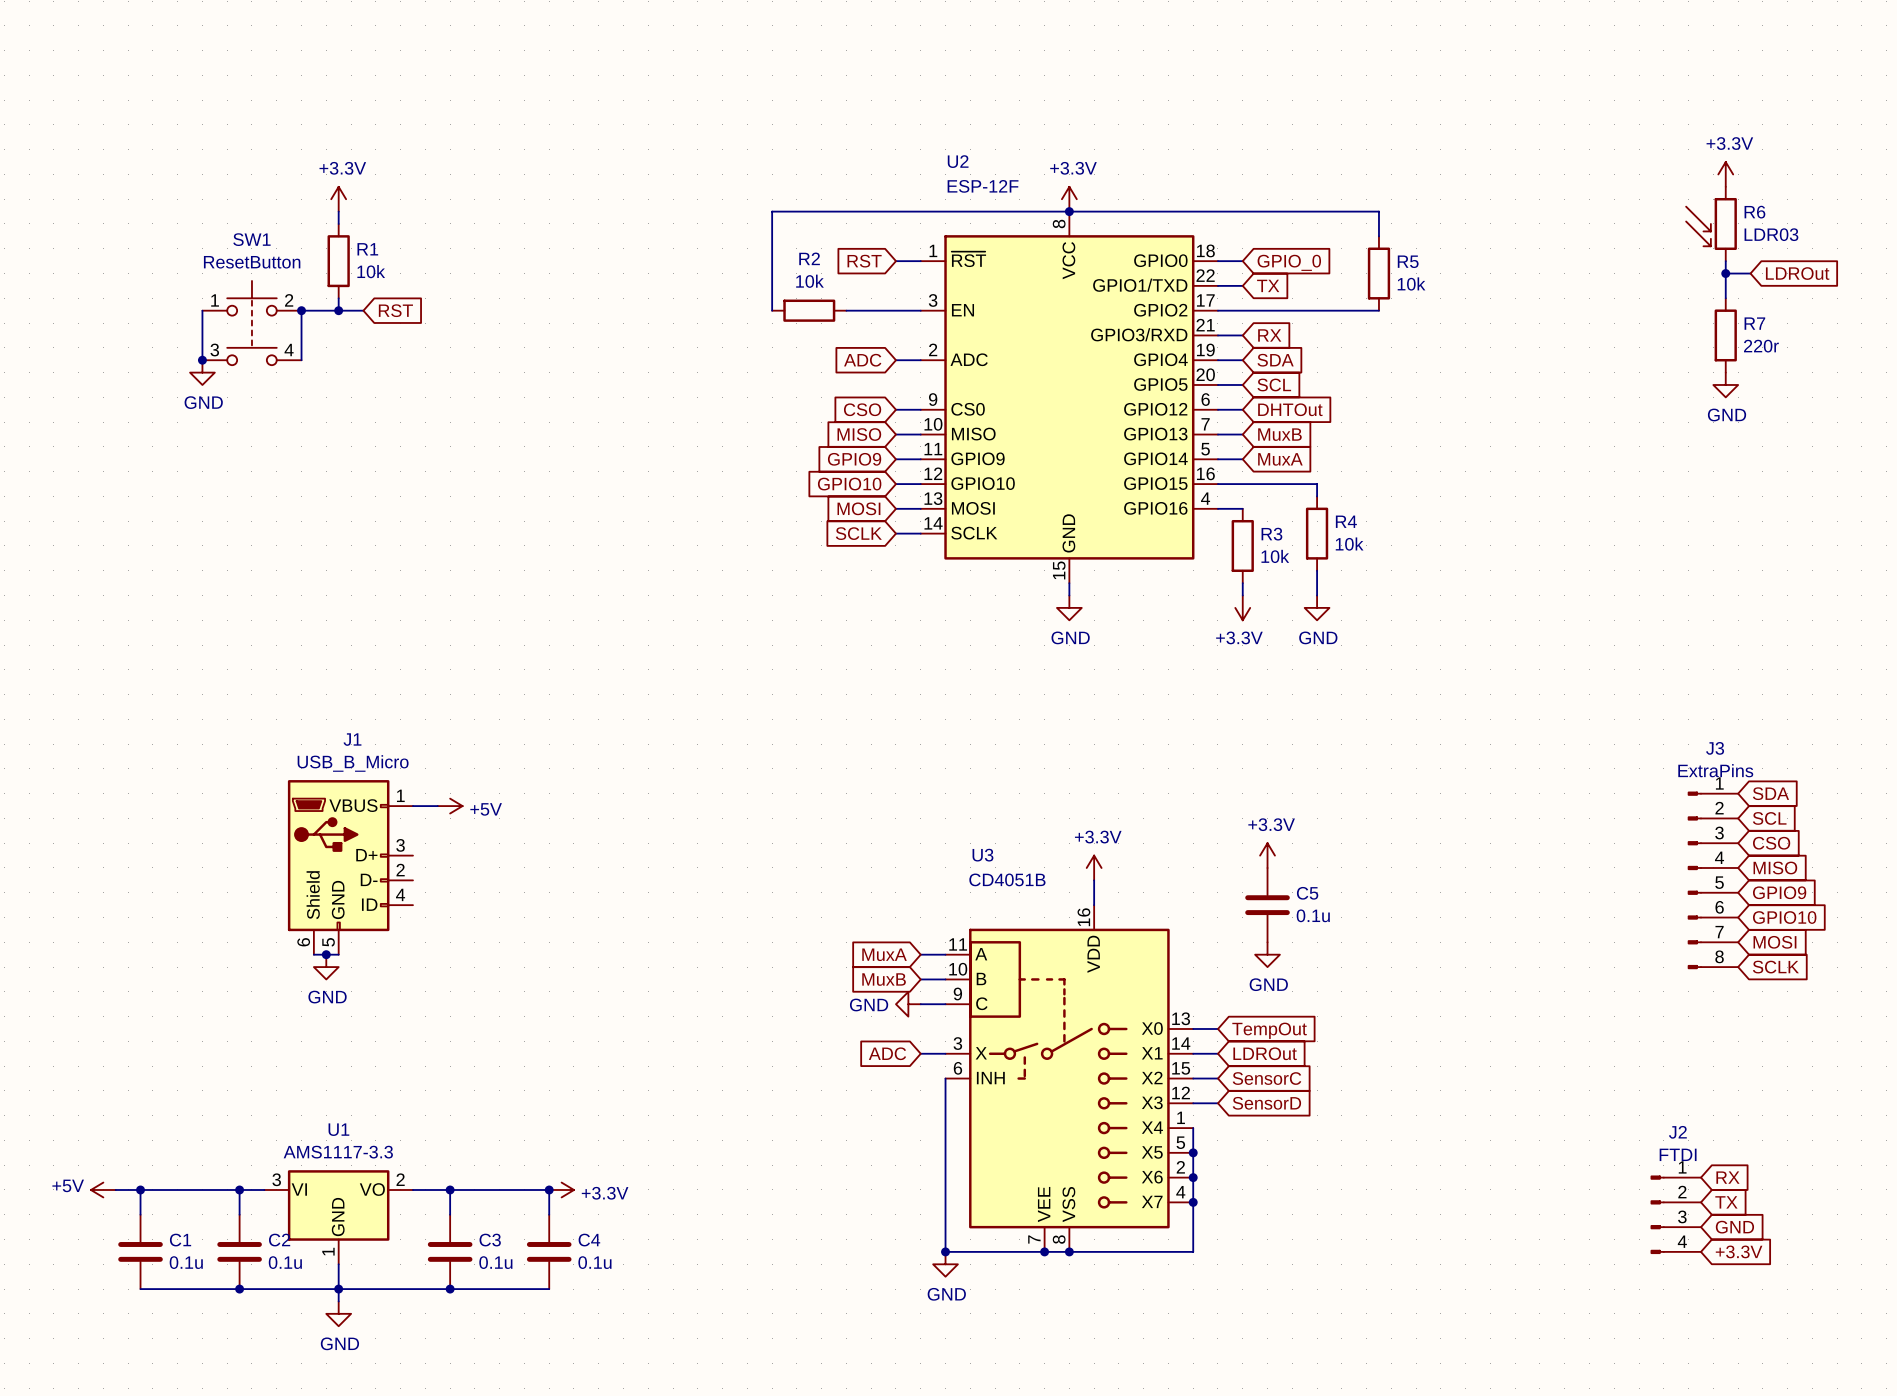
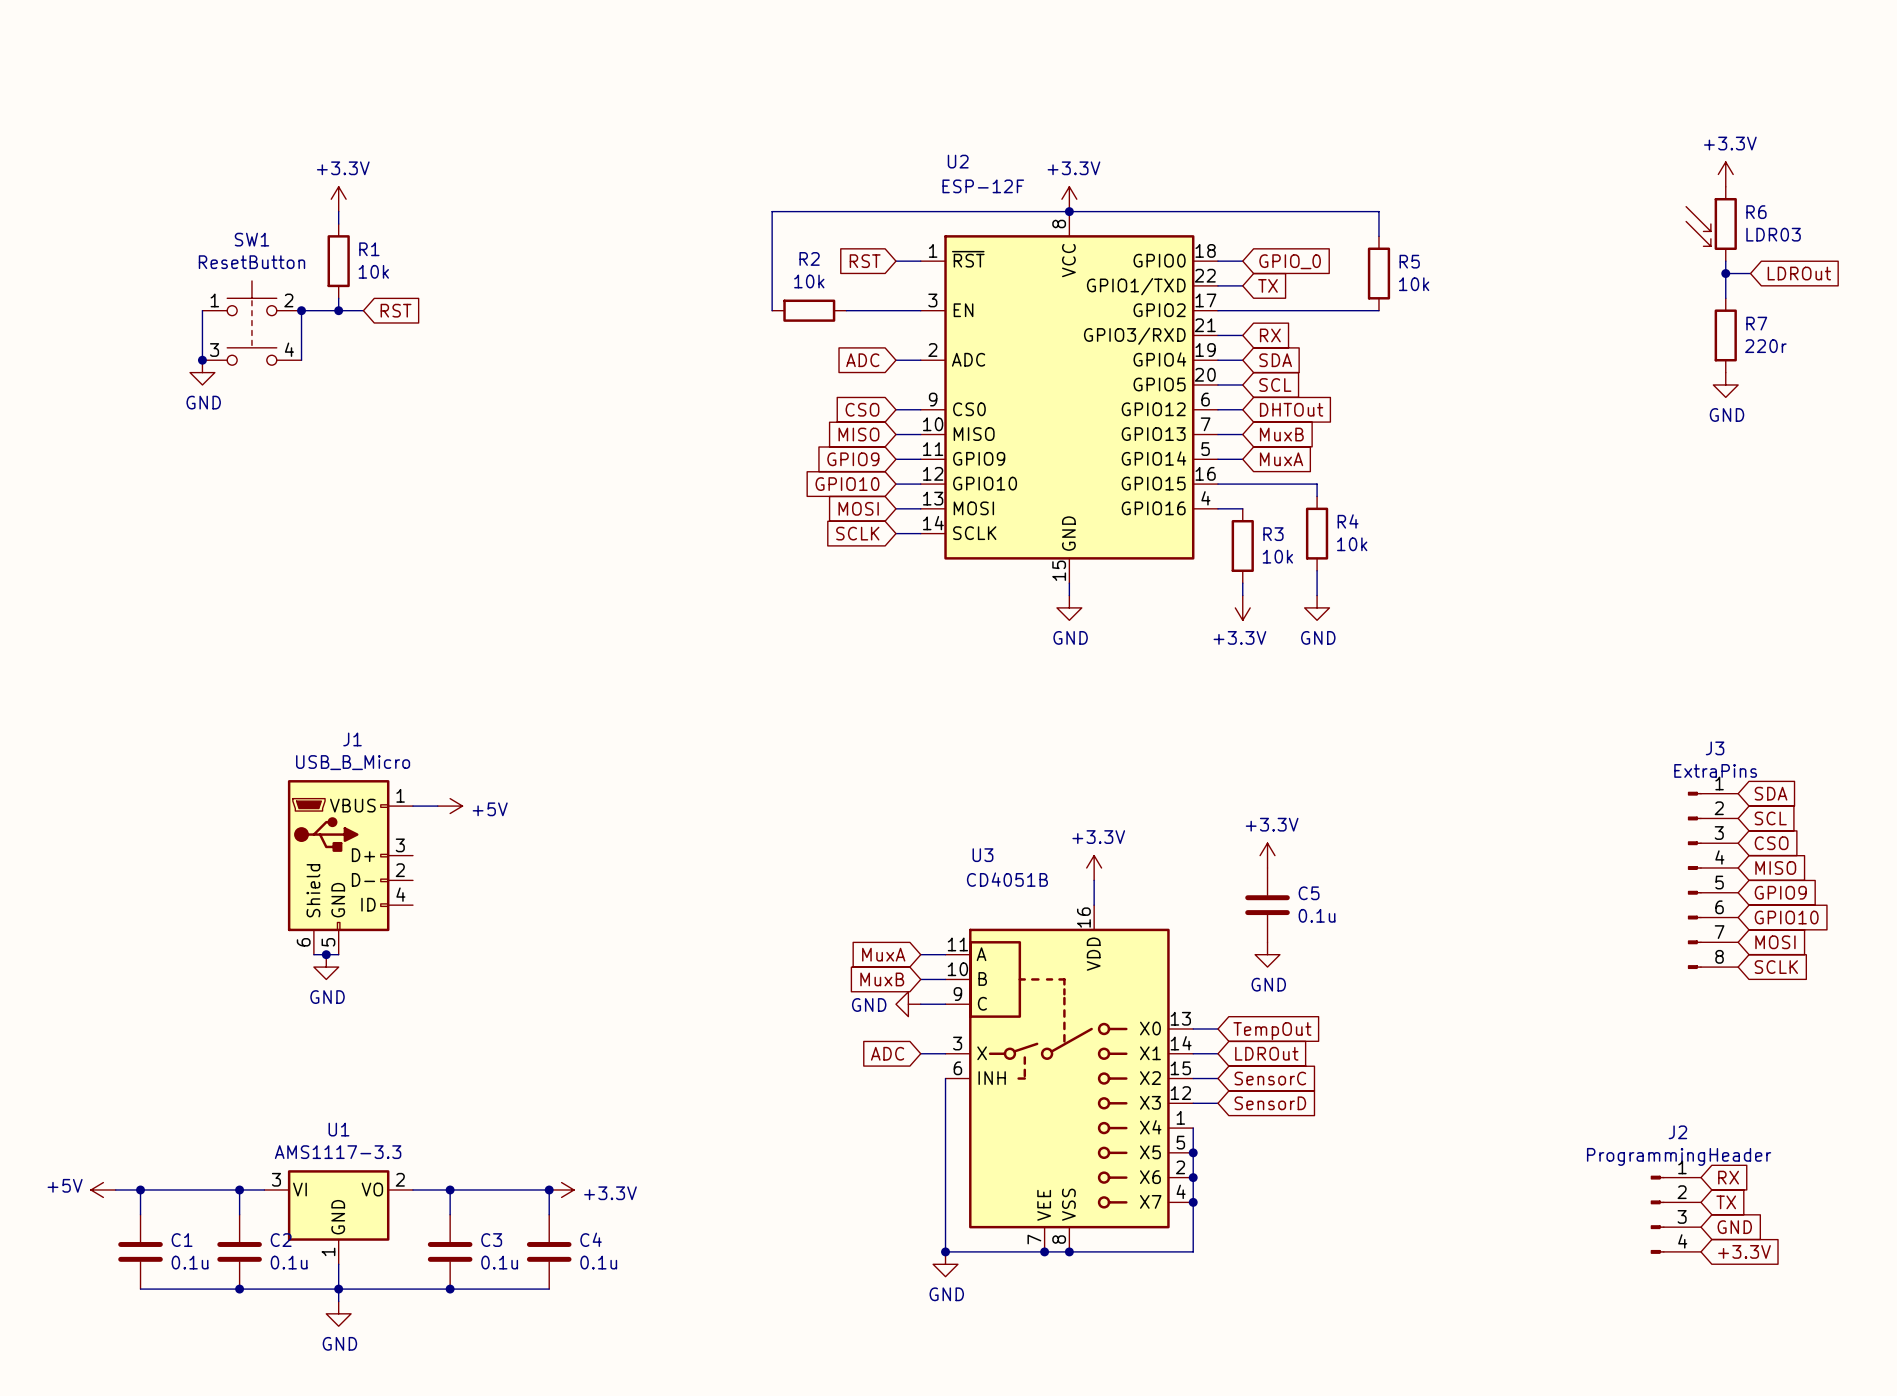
J2 value: FTDI (1678, 1154) -> ProgrammingHeader (1679, 1156)

